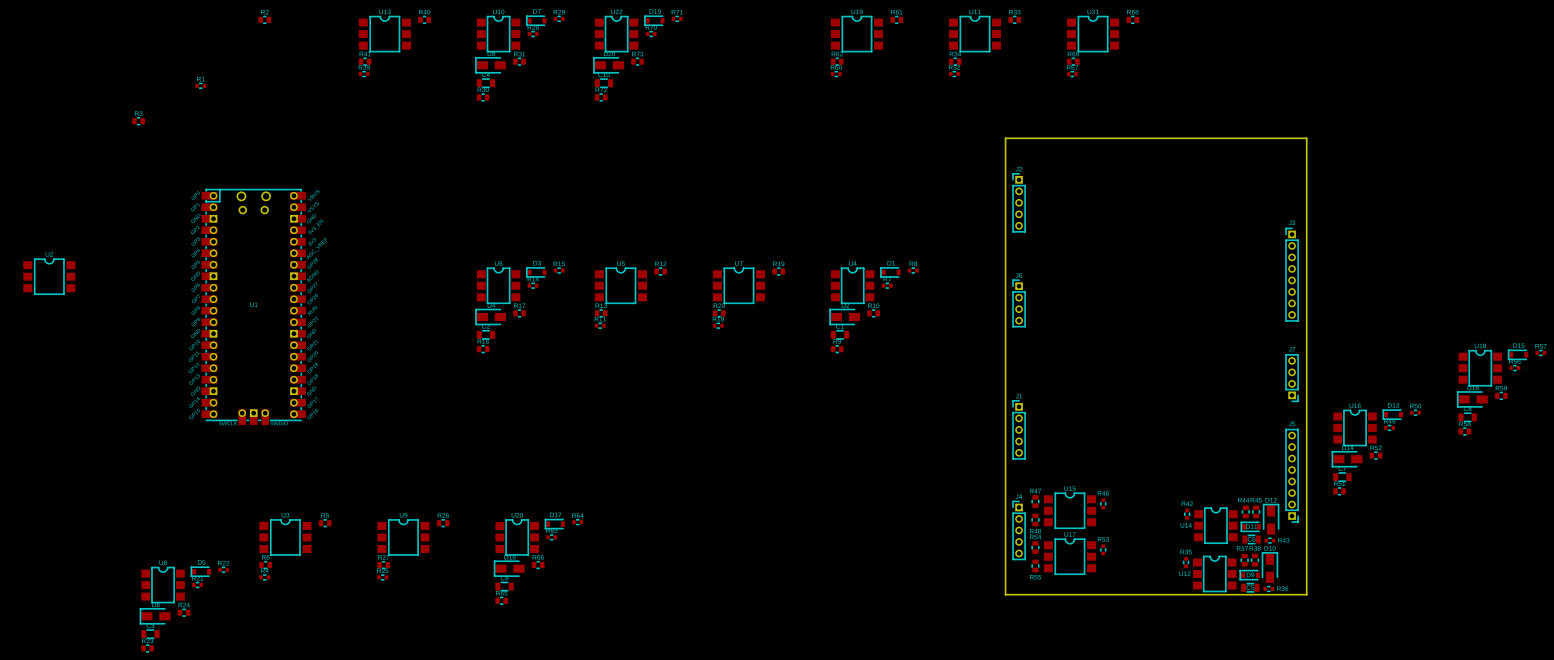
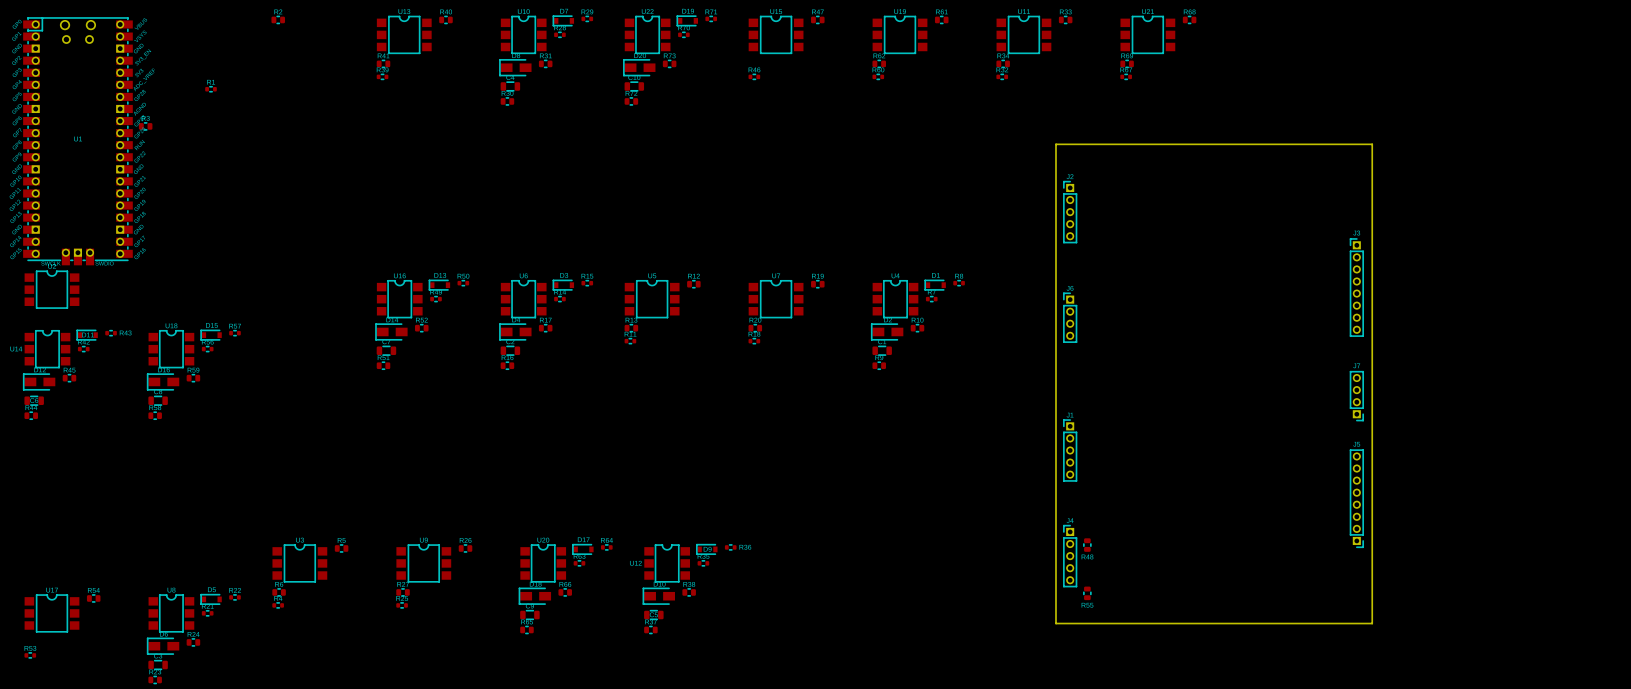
part position: (253, 307) -> (77, 141)
part position: (1540, 352) -> (234, 333)
part position: (1518, 354) -> (211, 335)
part position: (1480, 368) -> (171, 349)
part position: (1514, 368) -> (207, 349)
part position: (1501, 395) -> (193, 378)
part position: (1472, 399) -> (163, 381)
part position: (1415, 412) -> (463, 283)
part position: (1393, 414) -> (439, 285)
part position: (1467, 417) -> (158, 400)
part position: (1355, 427) -> (399, 299)
part position: (1389, 427) -> (436, 299)
part position: (1464, 431) -> (155, 415)
part position: (1375, 455) -> (421, 328)
part position: (1347, 459) -> (391, 331)
part position: (1342, 477) -> (386, 350)
part position: (1339, 491) -> (383, 365)
part rotation: 0° (1035, 501) -> 90° clockwise (817, 19)
part position: (1035, 501) -> (817, 19)
part rotation: 0° (1103, 503) -> 90° clockwise (754, 76)
part position: (1103, 503) -> (754, 76)
part position: (1069, 510) -> (776, 34)
part rotation: 0° (1245, 511) -> 90° clockwise (31, 415)
part position: (1245, 511) -> (31, 415)
part rotation: 0° (1256, 511) -> 90° clockwise (69, 378)
part position: (1256, 511) -> (69, 378)
part rotation: 0° (1187, 514) -> 90° clockwise (83, 349)
part position: (1187, 514) -> (83, 349)
part rotation: 0° (1271, 519) -> 90° counterclockwise (39, 381)
part position: (1271, 519) -> (39, 381)
part position: (1215, 525) -> (47, 349)
part position: (1251, 526) -> (87, 335)
part position: (1251, 539) -> (34, 400)
part position: (1269, 540) -> (111, 333)
part rotation: 0° (1035, 547) -> 90° clockwise (93, 598)
part position: (1035, 547) -> (93, 598)
part rotation: 0° (1103, 549) -> 90° clockwise (30, 655)
part position: (1103, 549) -> (30, 655)
part position: (1069, 556) -> (51, 613)
part rotation: 0° (1244, 560) -> 90° clockwise (650, 629)
part position: (1244, 560) -> (650, 629)
part rotation: 0° (1255, 560) -> 90° clockwise (689, 592)
part position: (1255, 560) -> (689, 592)
part rotation: 0° (1186, 562) -> 90° clockwise (703, 563)
part position: (1186, 562) -> (703, 563)
part rotation: 0° (1269, 567) -> 90° counterclockwise (659, 596)
part position: (1269, 567) -> (659, 596)
part position: (1214, 573) -> (667, 563)
part position: (1249, 575) -> (707, 549)
part position: (1250, 587) -> (653, 615)
part position: (1268, 588) -> (730, 547)

